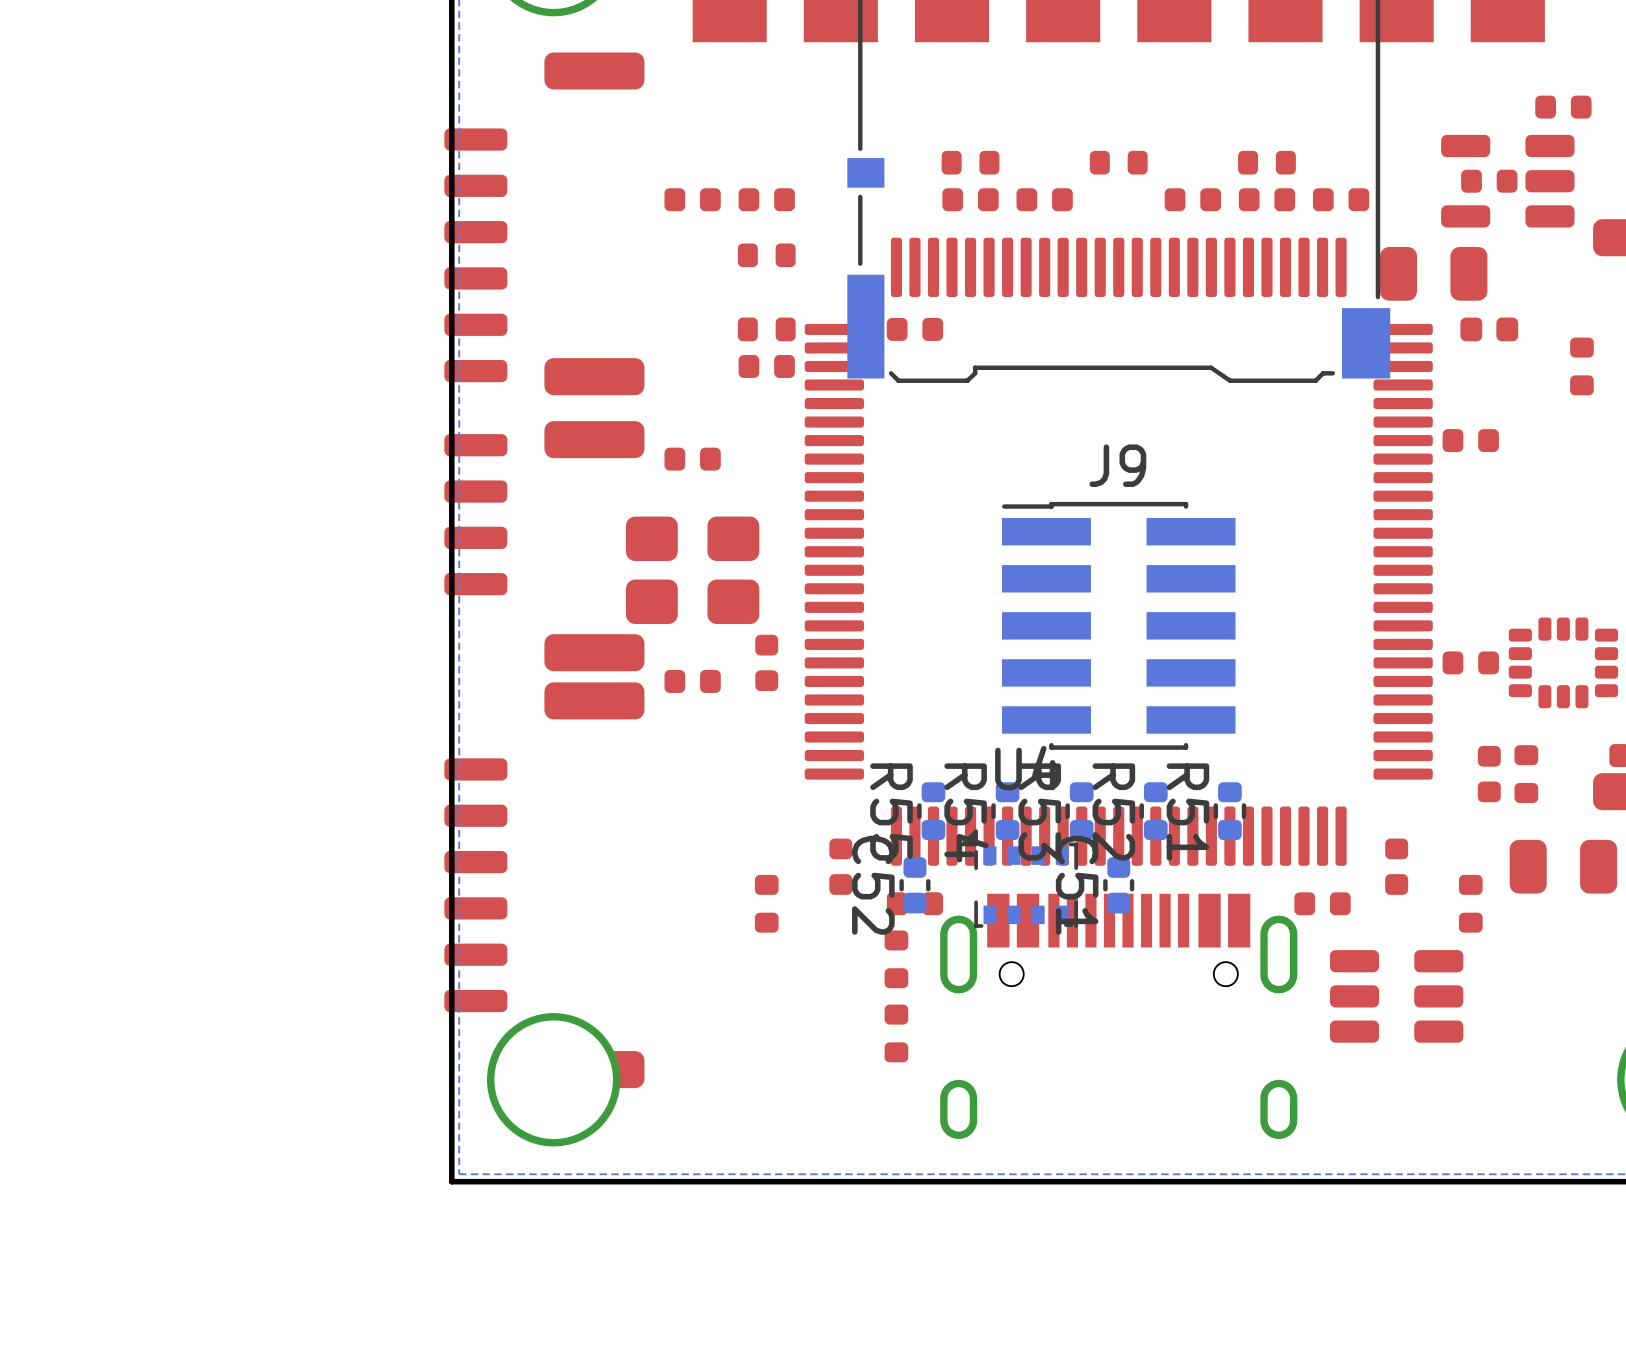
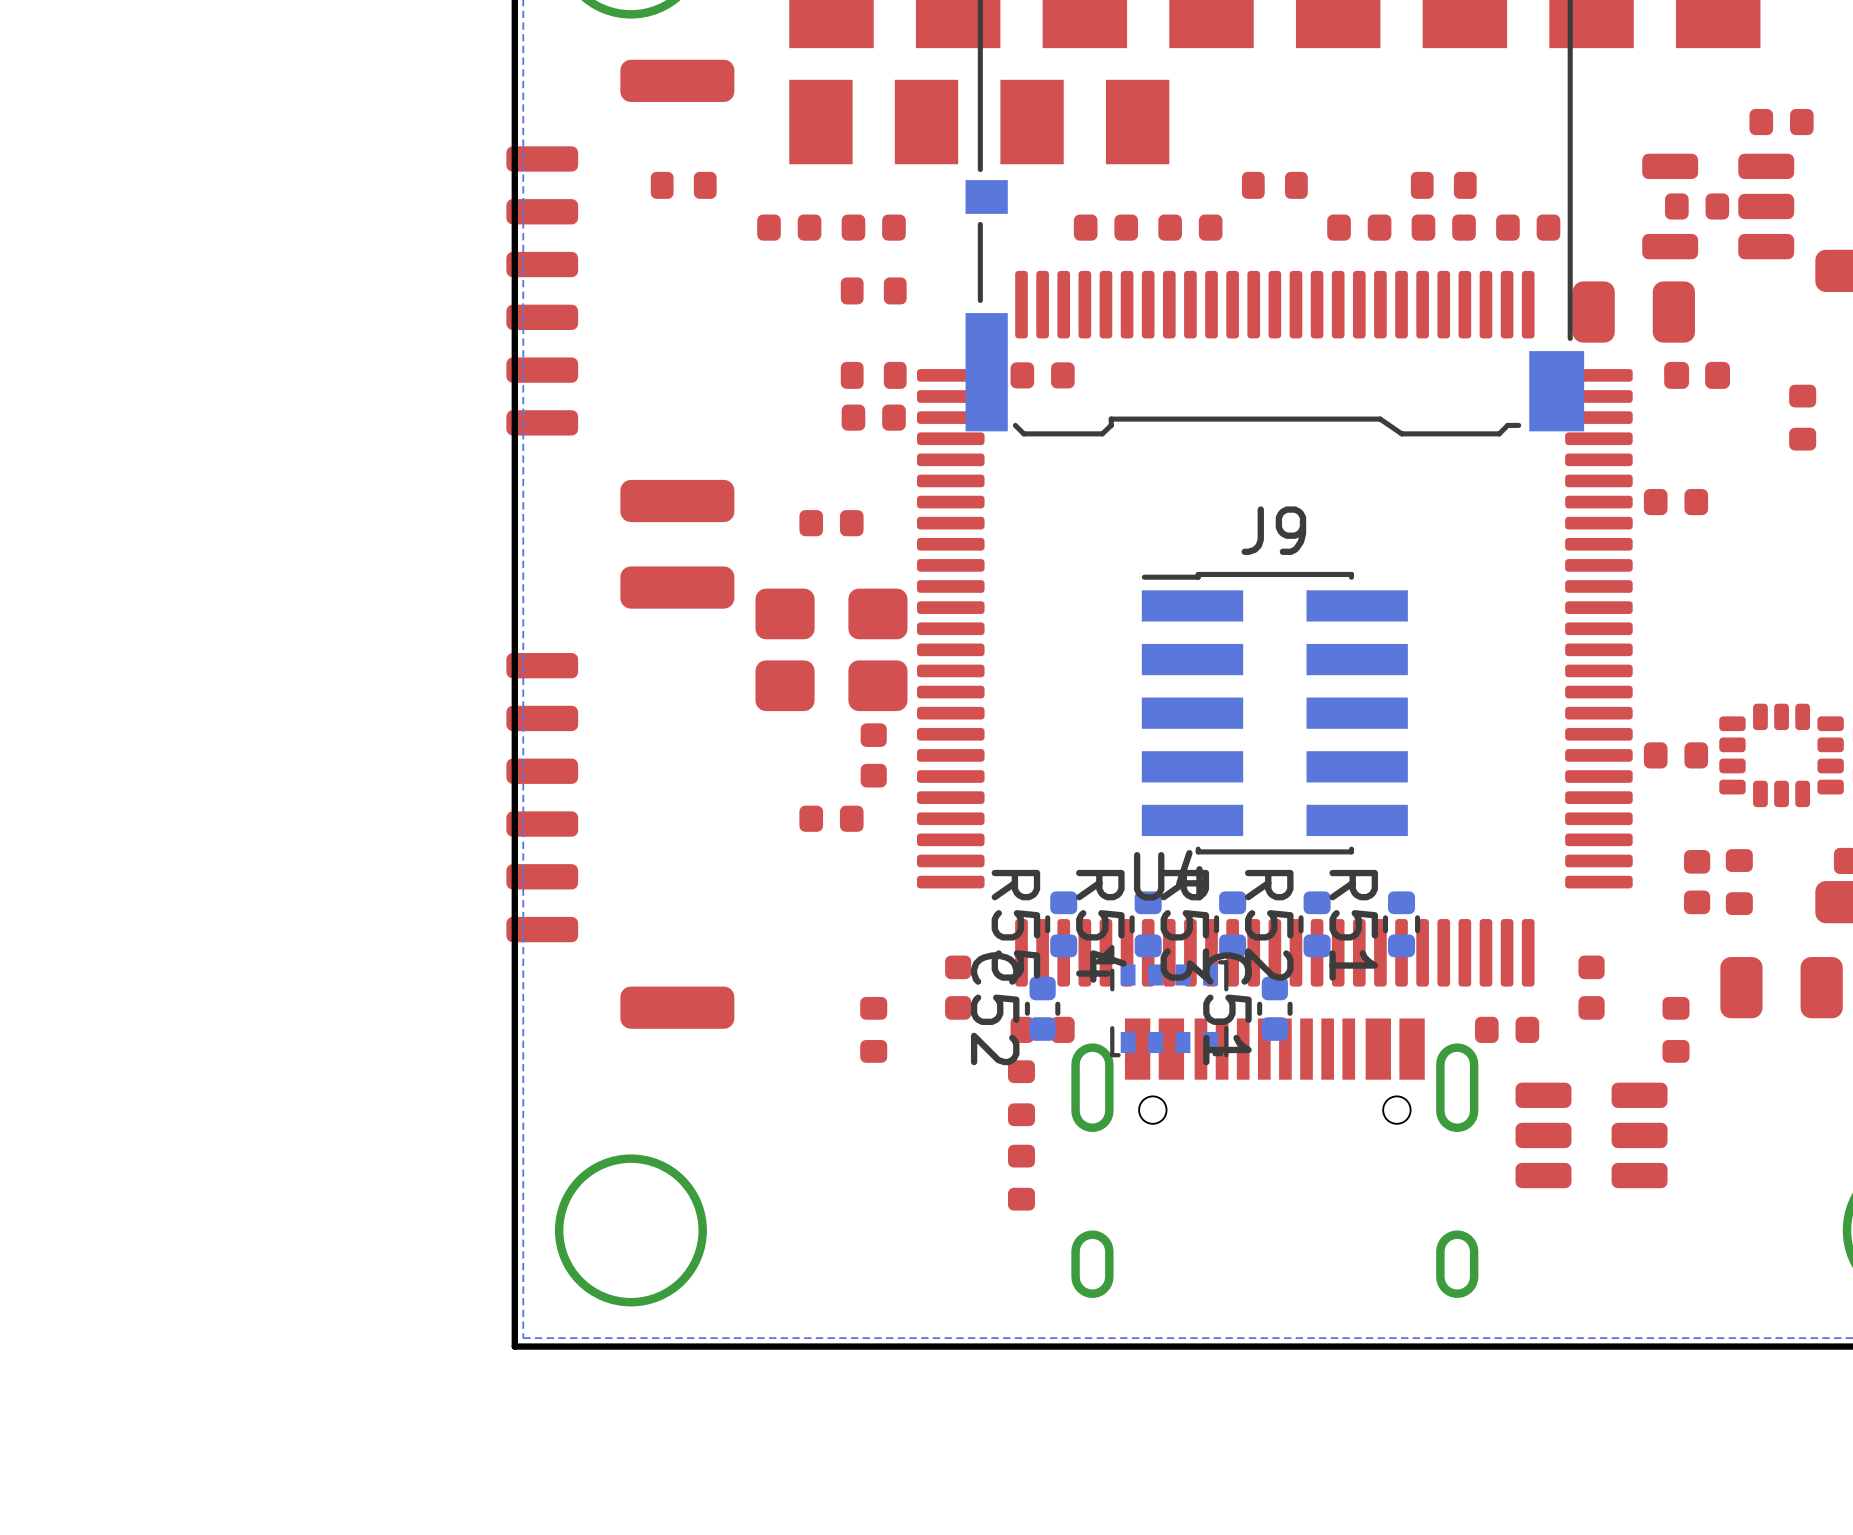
part: none -> (979, 122)
part position: (970, 162) -> (683, 185)
part position: (692, 459) -> (831, 523)
part: (544, 514) -> none
part position: (692, 570) -> (831, 649)
part position: (692, 681) -> (831, 818)
part position: (544, 885) -> (620, 797)

